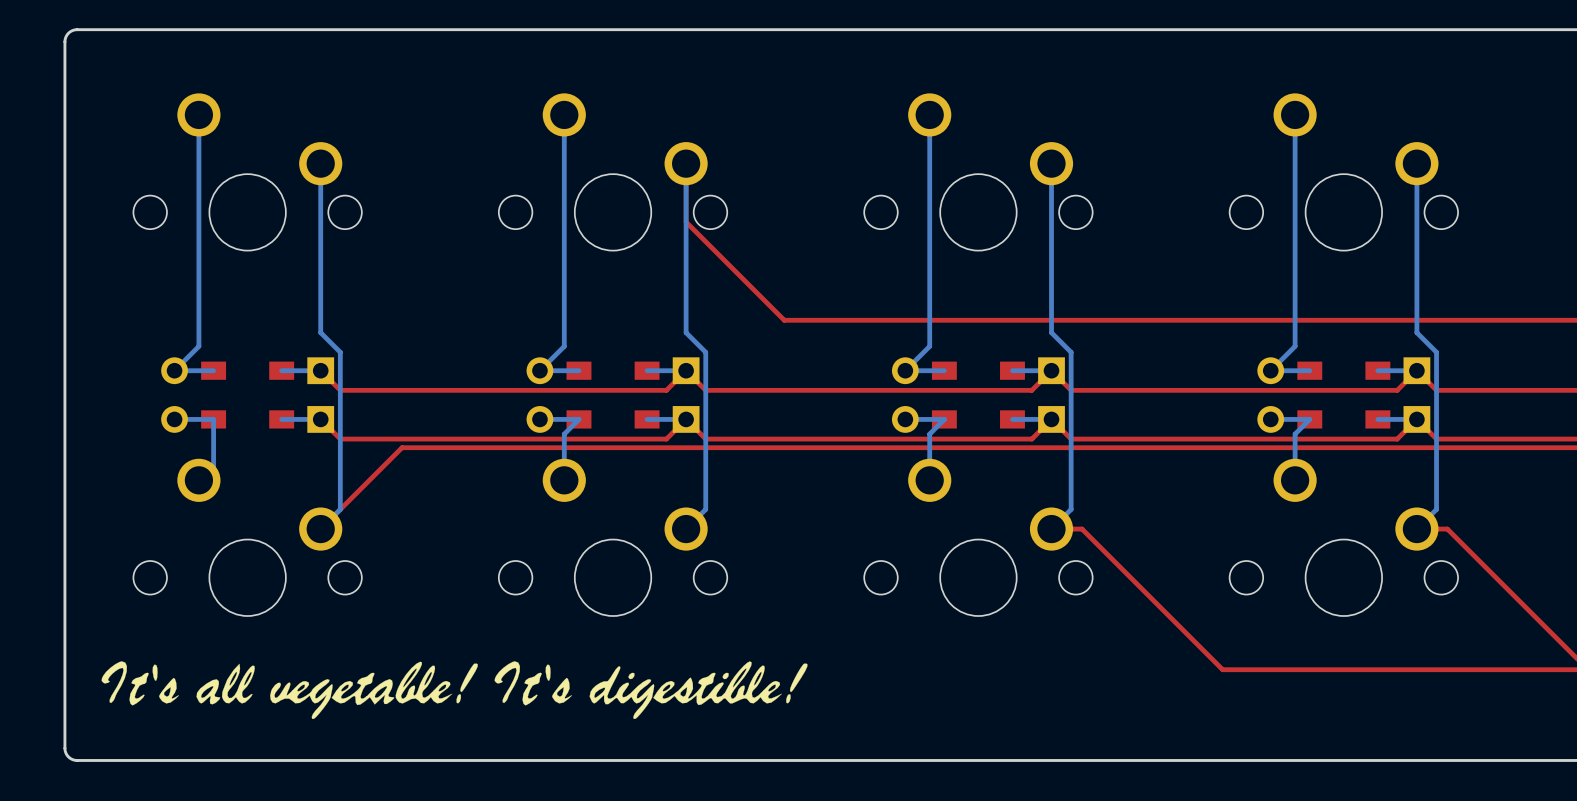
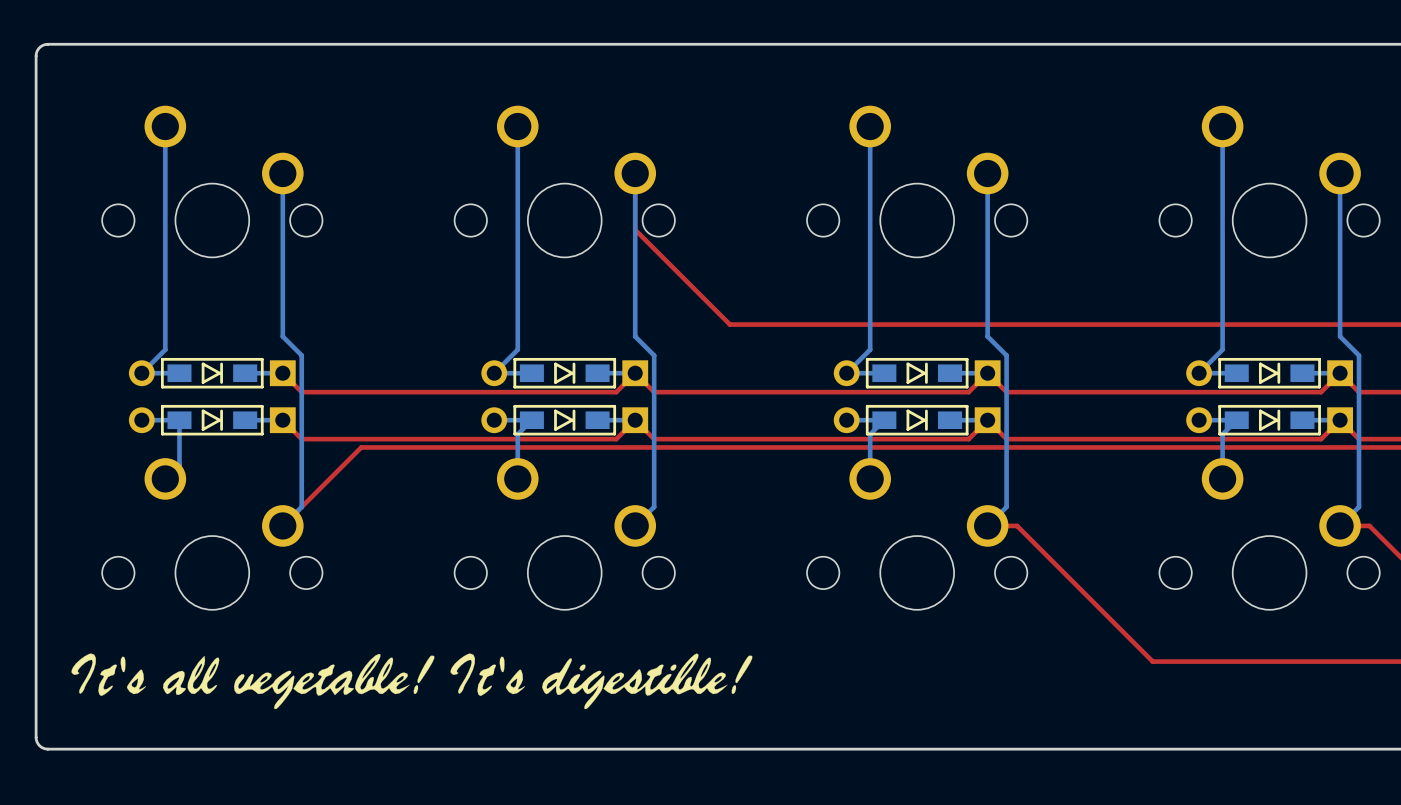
part side: top (247, 370) -> bottom (212, 373)
part side: top (613, 370) -> bottom (564, 373)
part side: top (978, 370) -> bottom (917, 373)
part side: top (1343, 370) -> bottom (1269, 373)
part side: top (247, 419) -> bottom (212, 420)
part side: top (613, 419) -> bottom (564, 420)
part side: top (978, 419) -> bottom (917, 420)
part side: top (1343, 419) -> bottom (1269, 420)

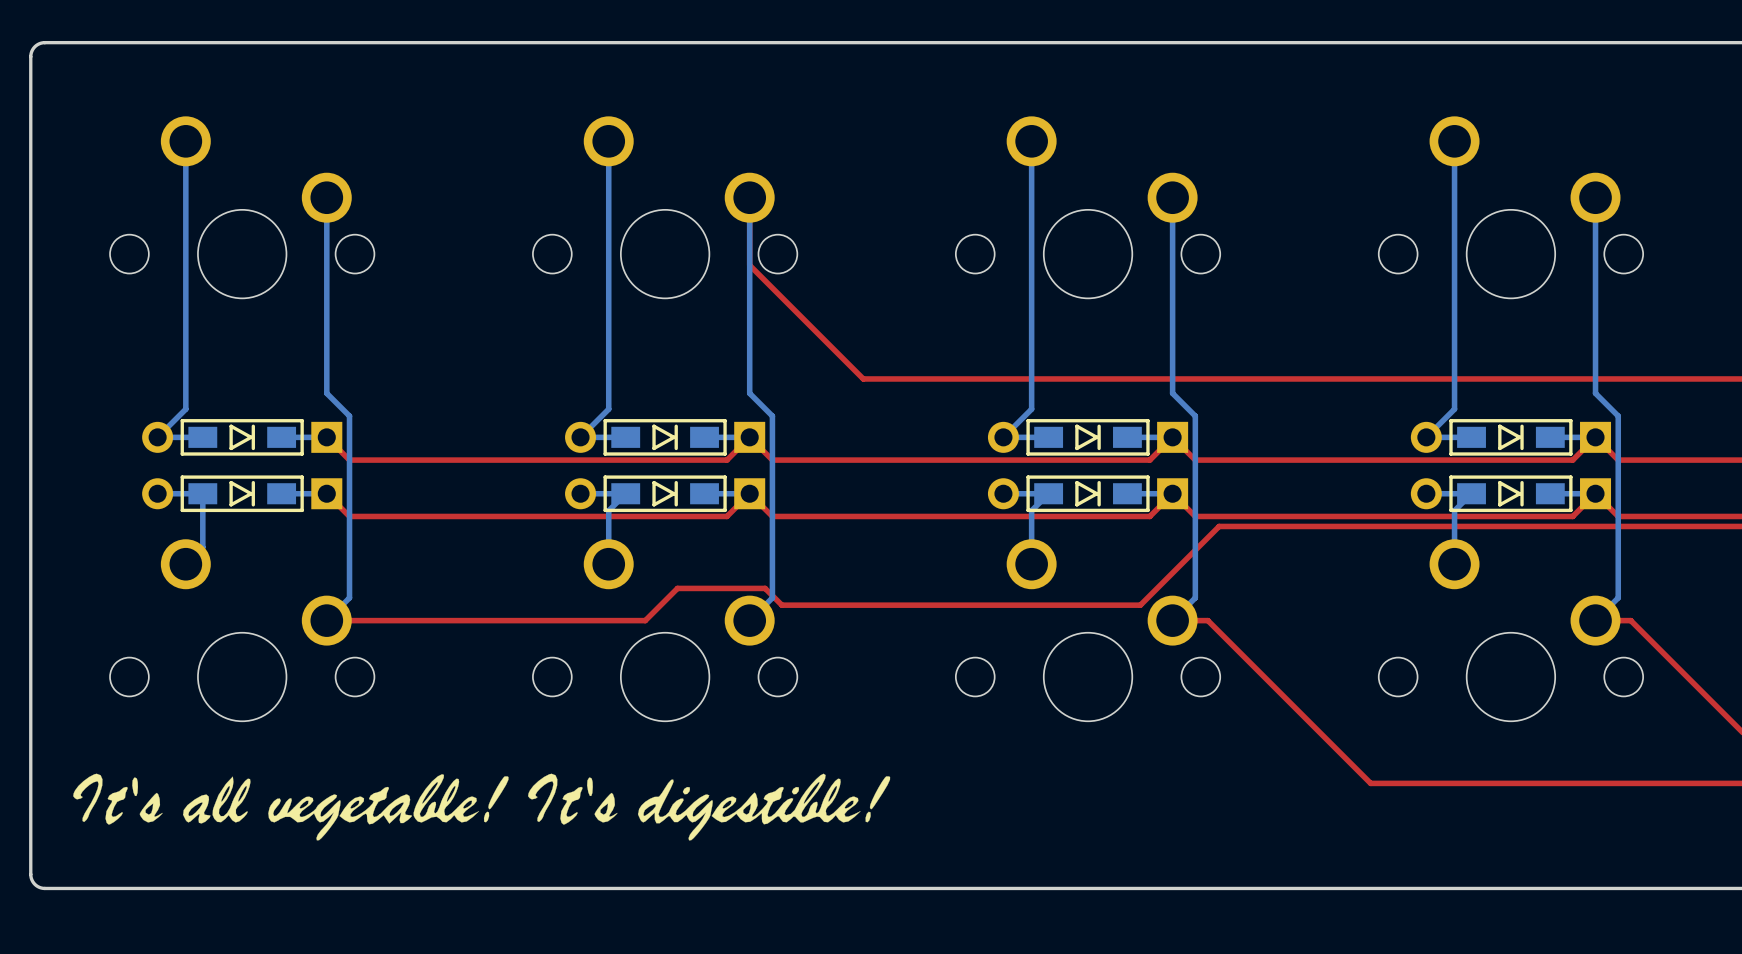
top track: (1026, 447) (361, 447) (282, 525) -> (1219, 526) (1140, 605) (781, 605) (765, 588) (677, 588) (645, 620) (326, 620)

